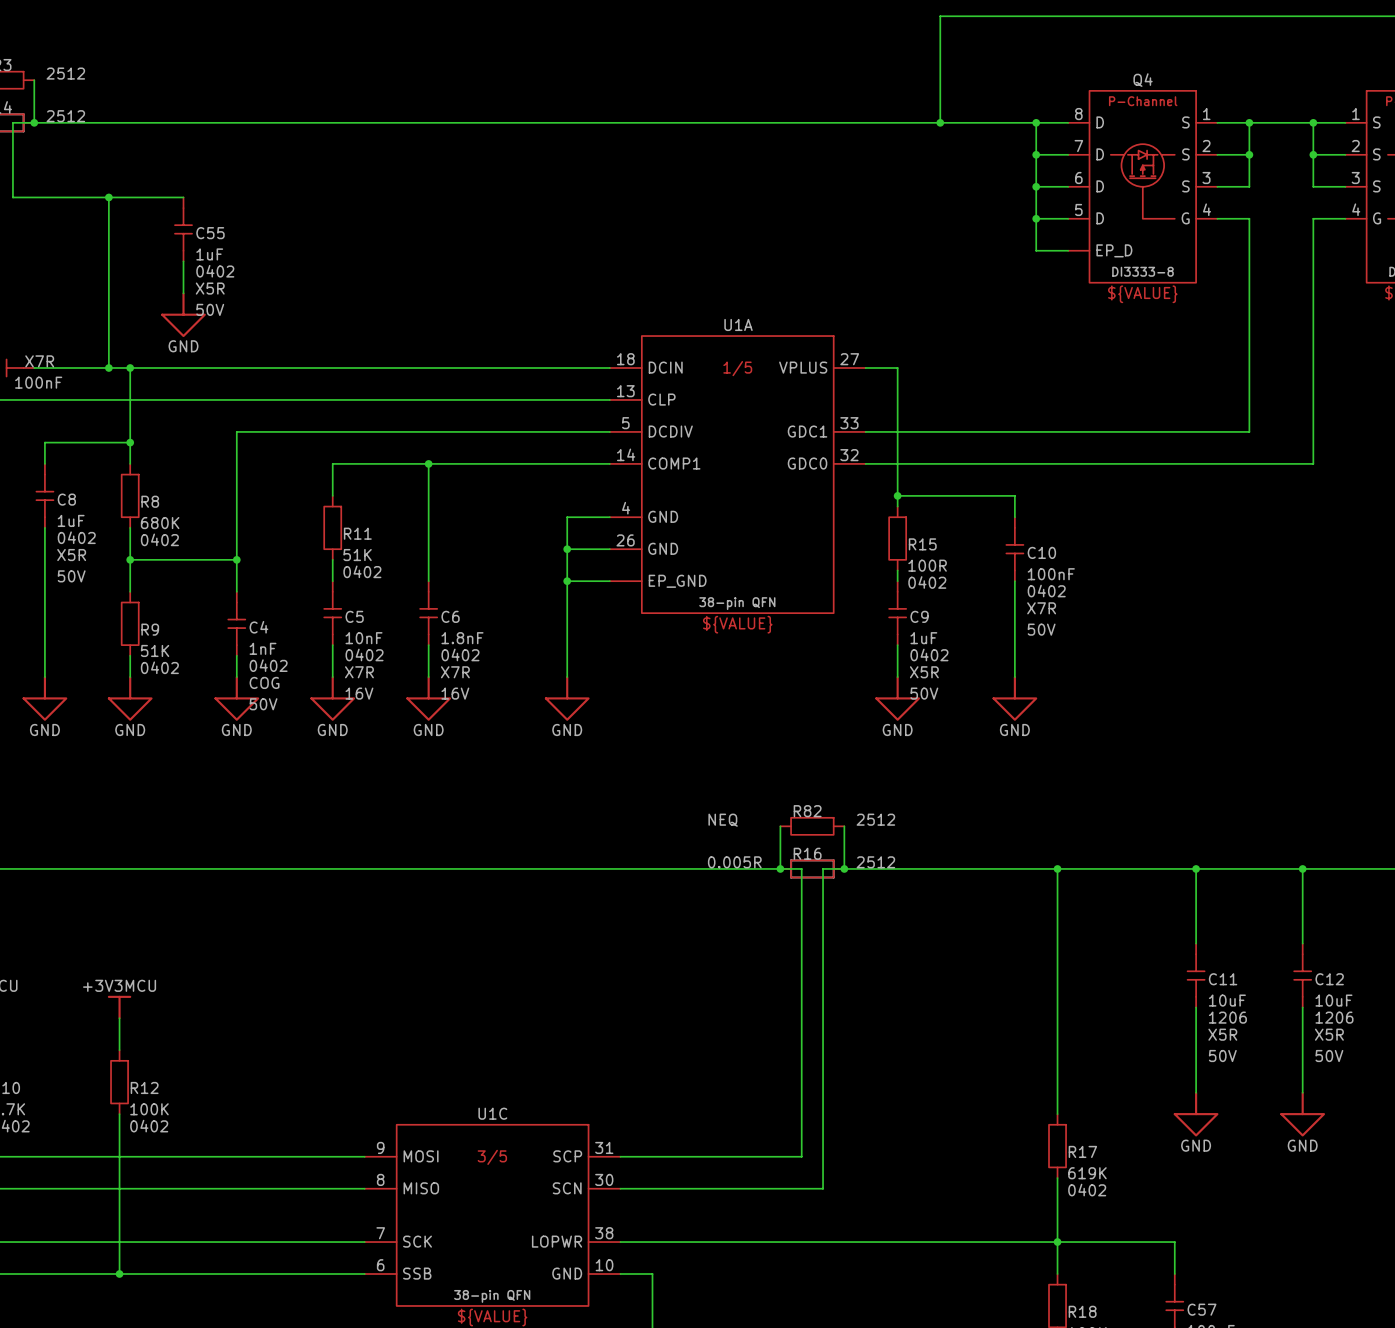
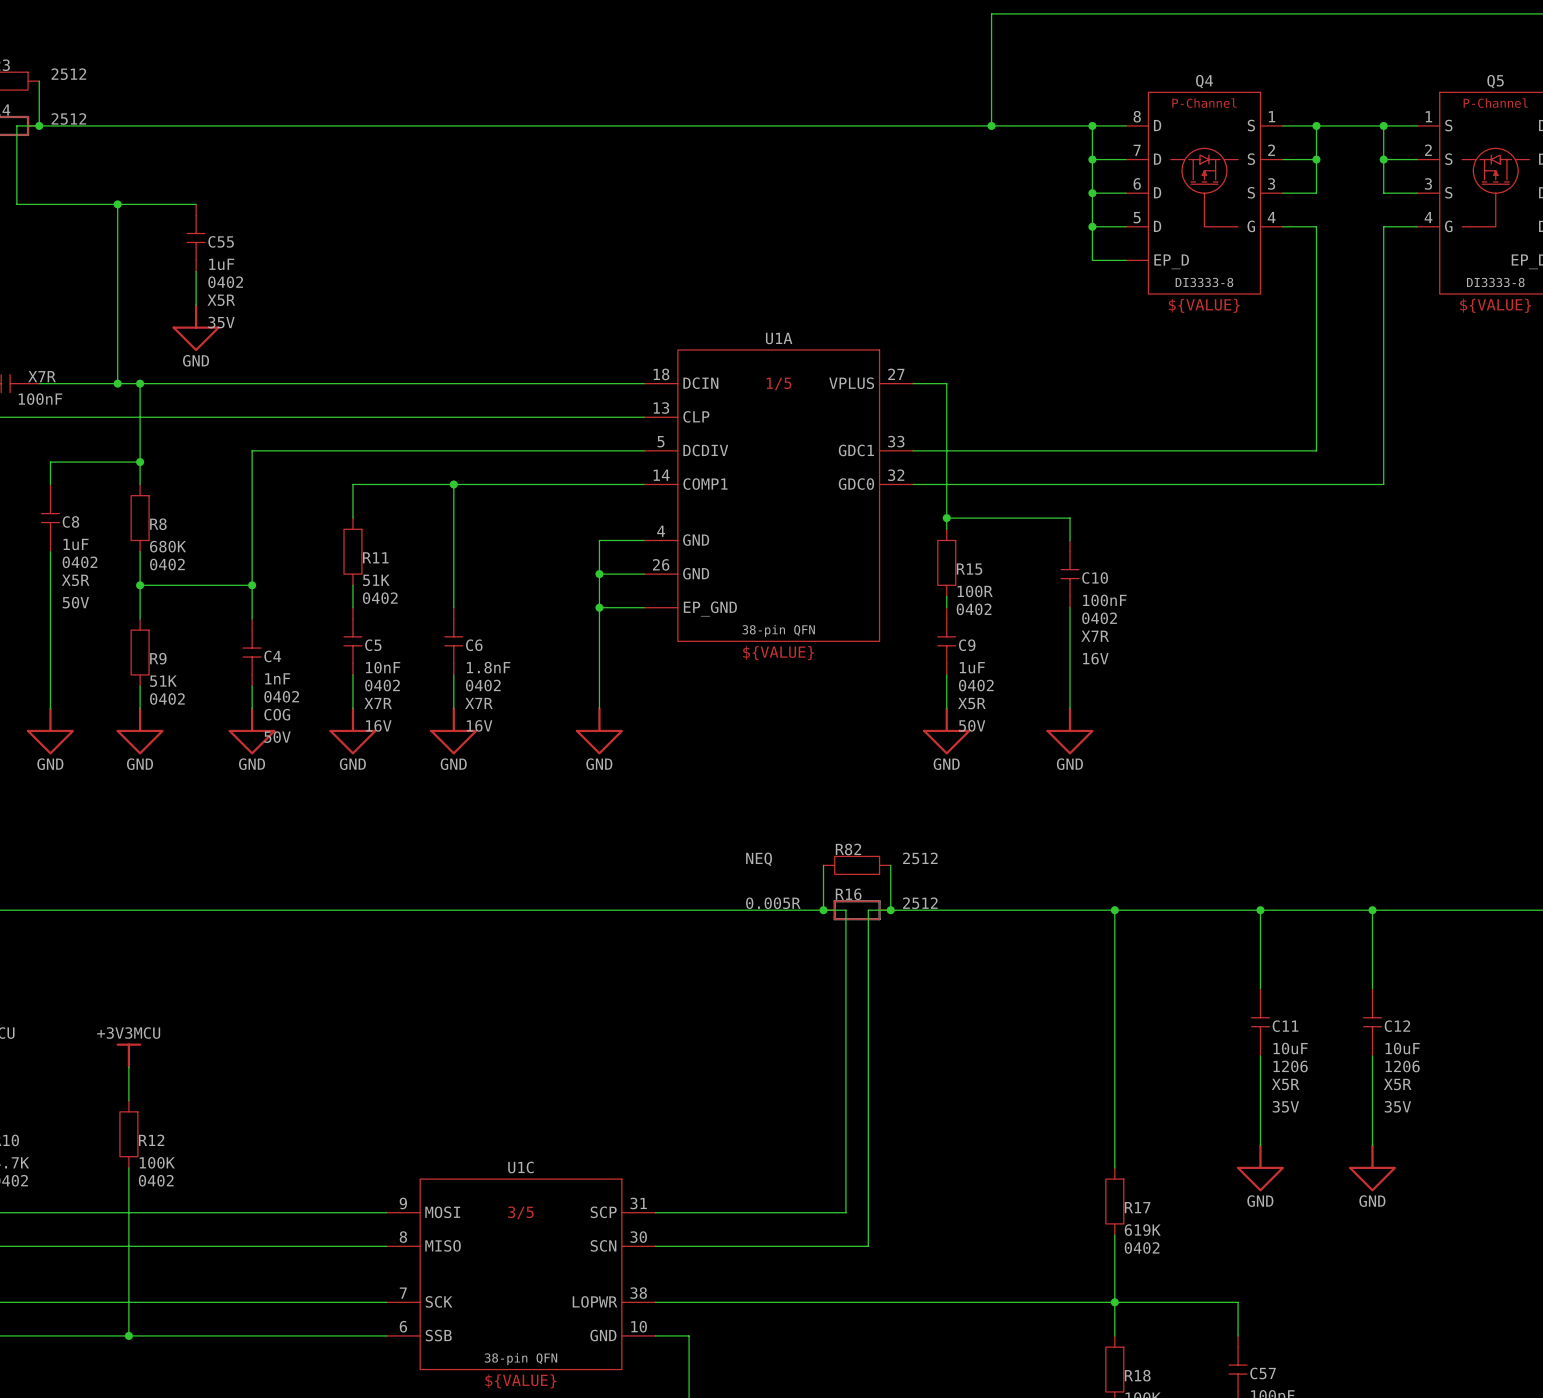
C55 text: 50V (210, 309) -> 35V (221, 322)
C10 text: 50V (1041, 629) -> 16V (1095, 658)
C11 text: 50V (1222, 1056) -> 35V (1285, 1106)
C12 text: 50V (1329, 1056) -> 35V (1397, 1106)

